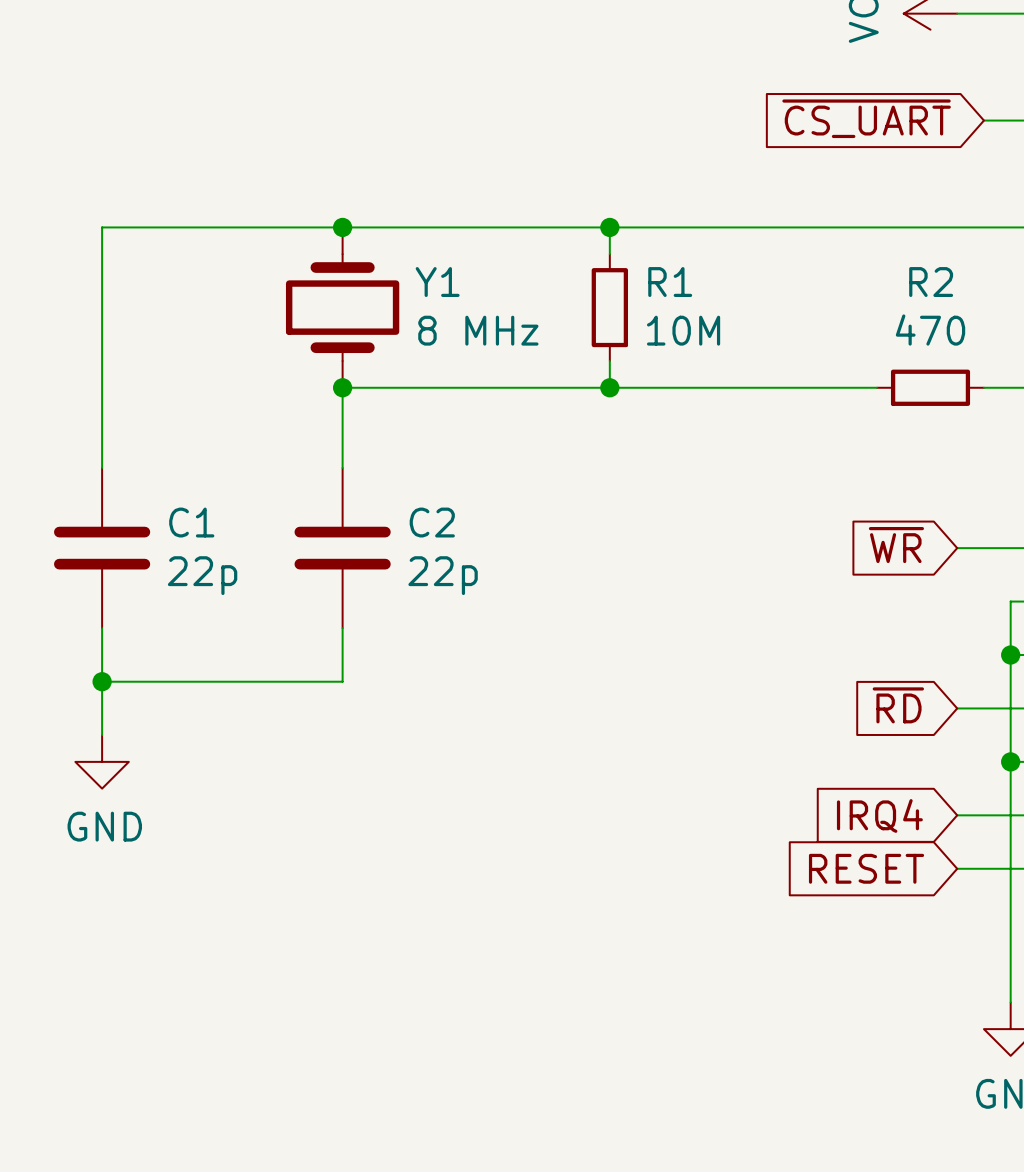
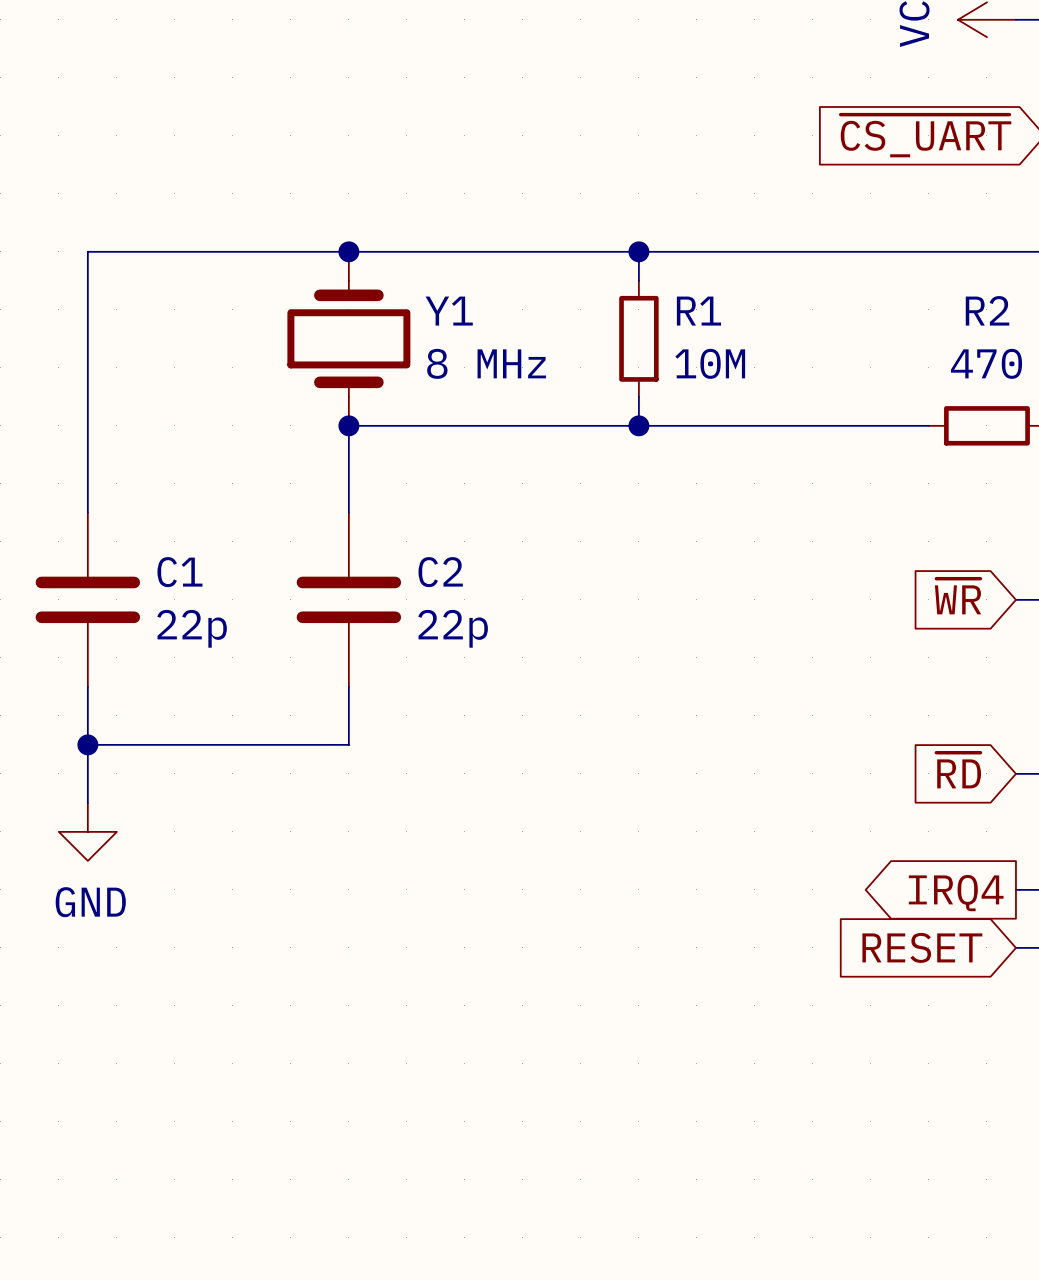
global label shape: input (879, 815) -> output (956, 893)

